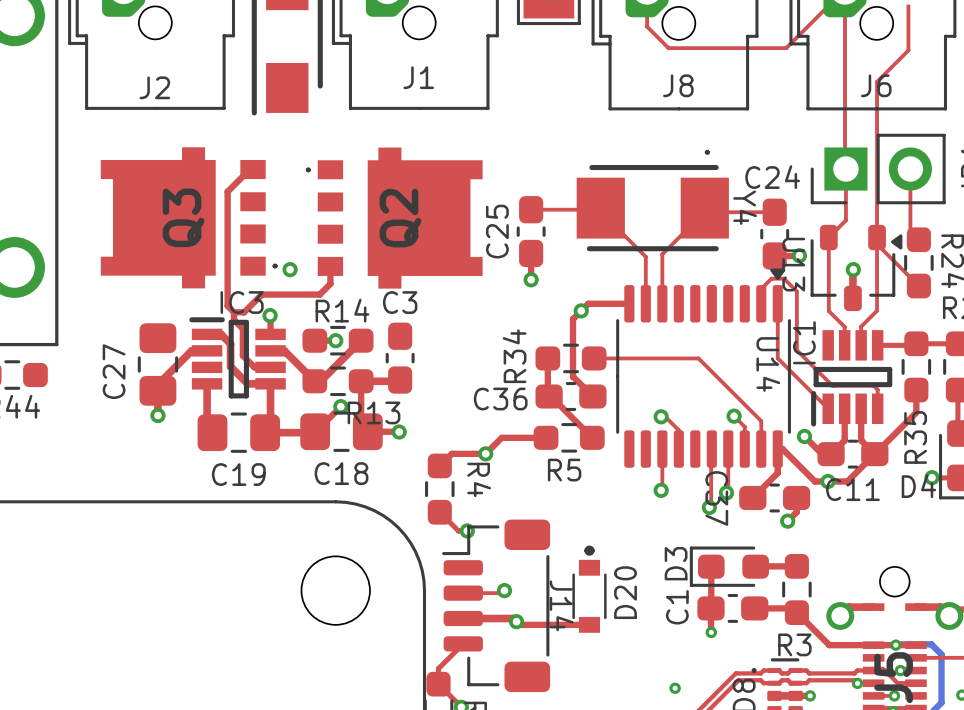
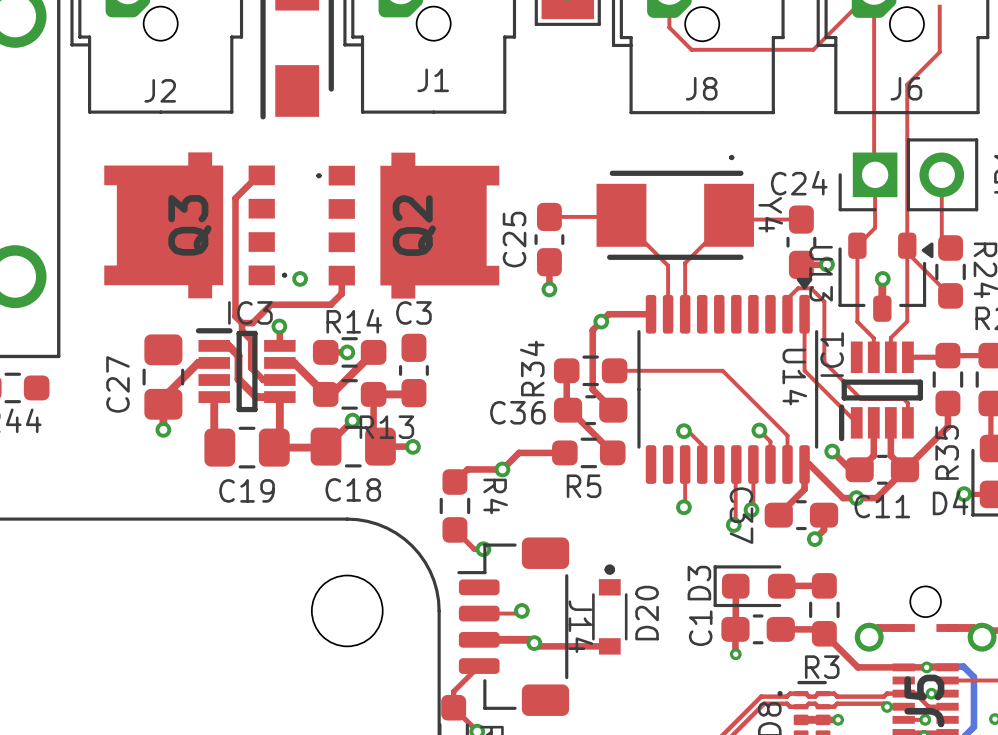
via: (675, 688) -> none

